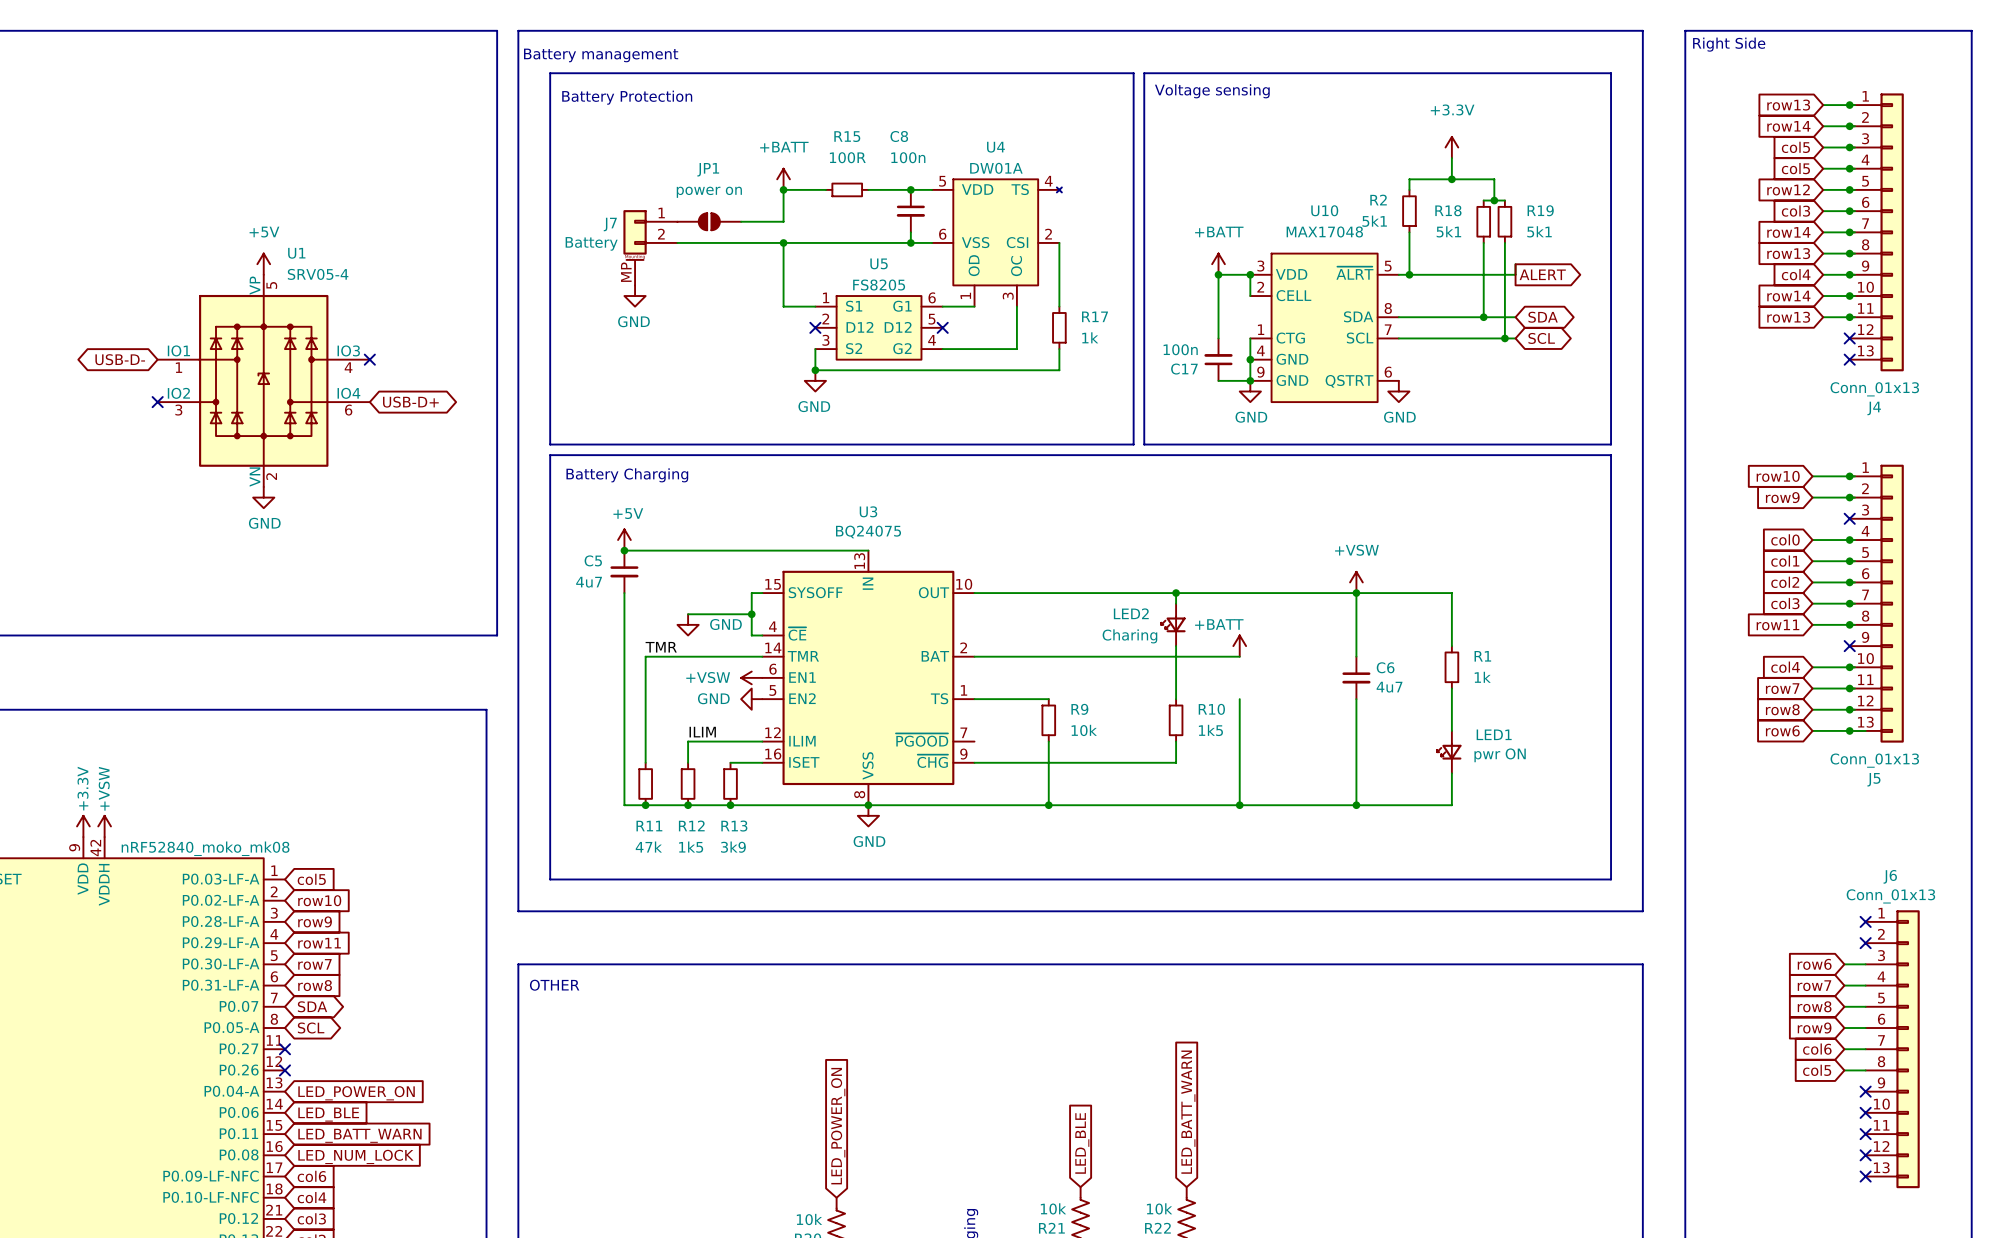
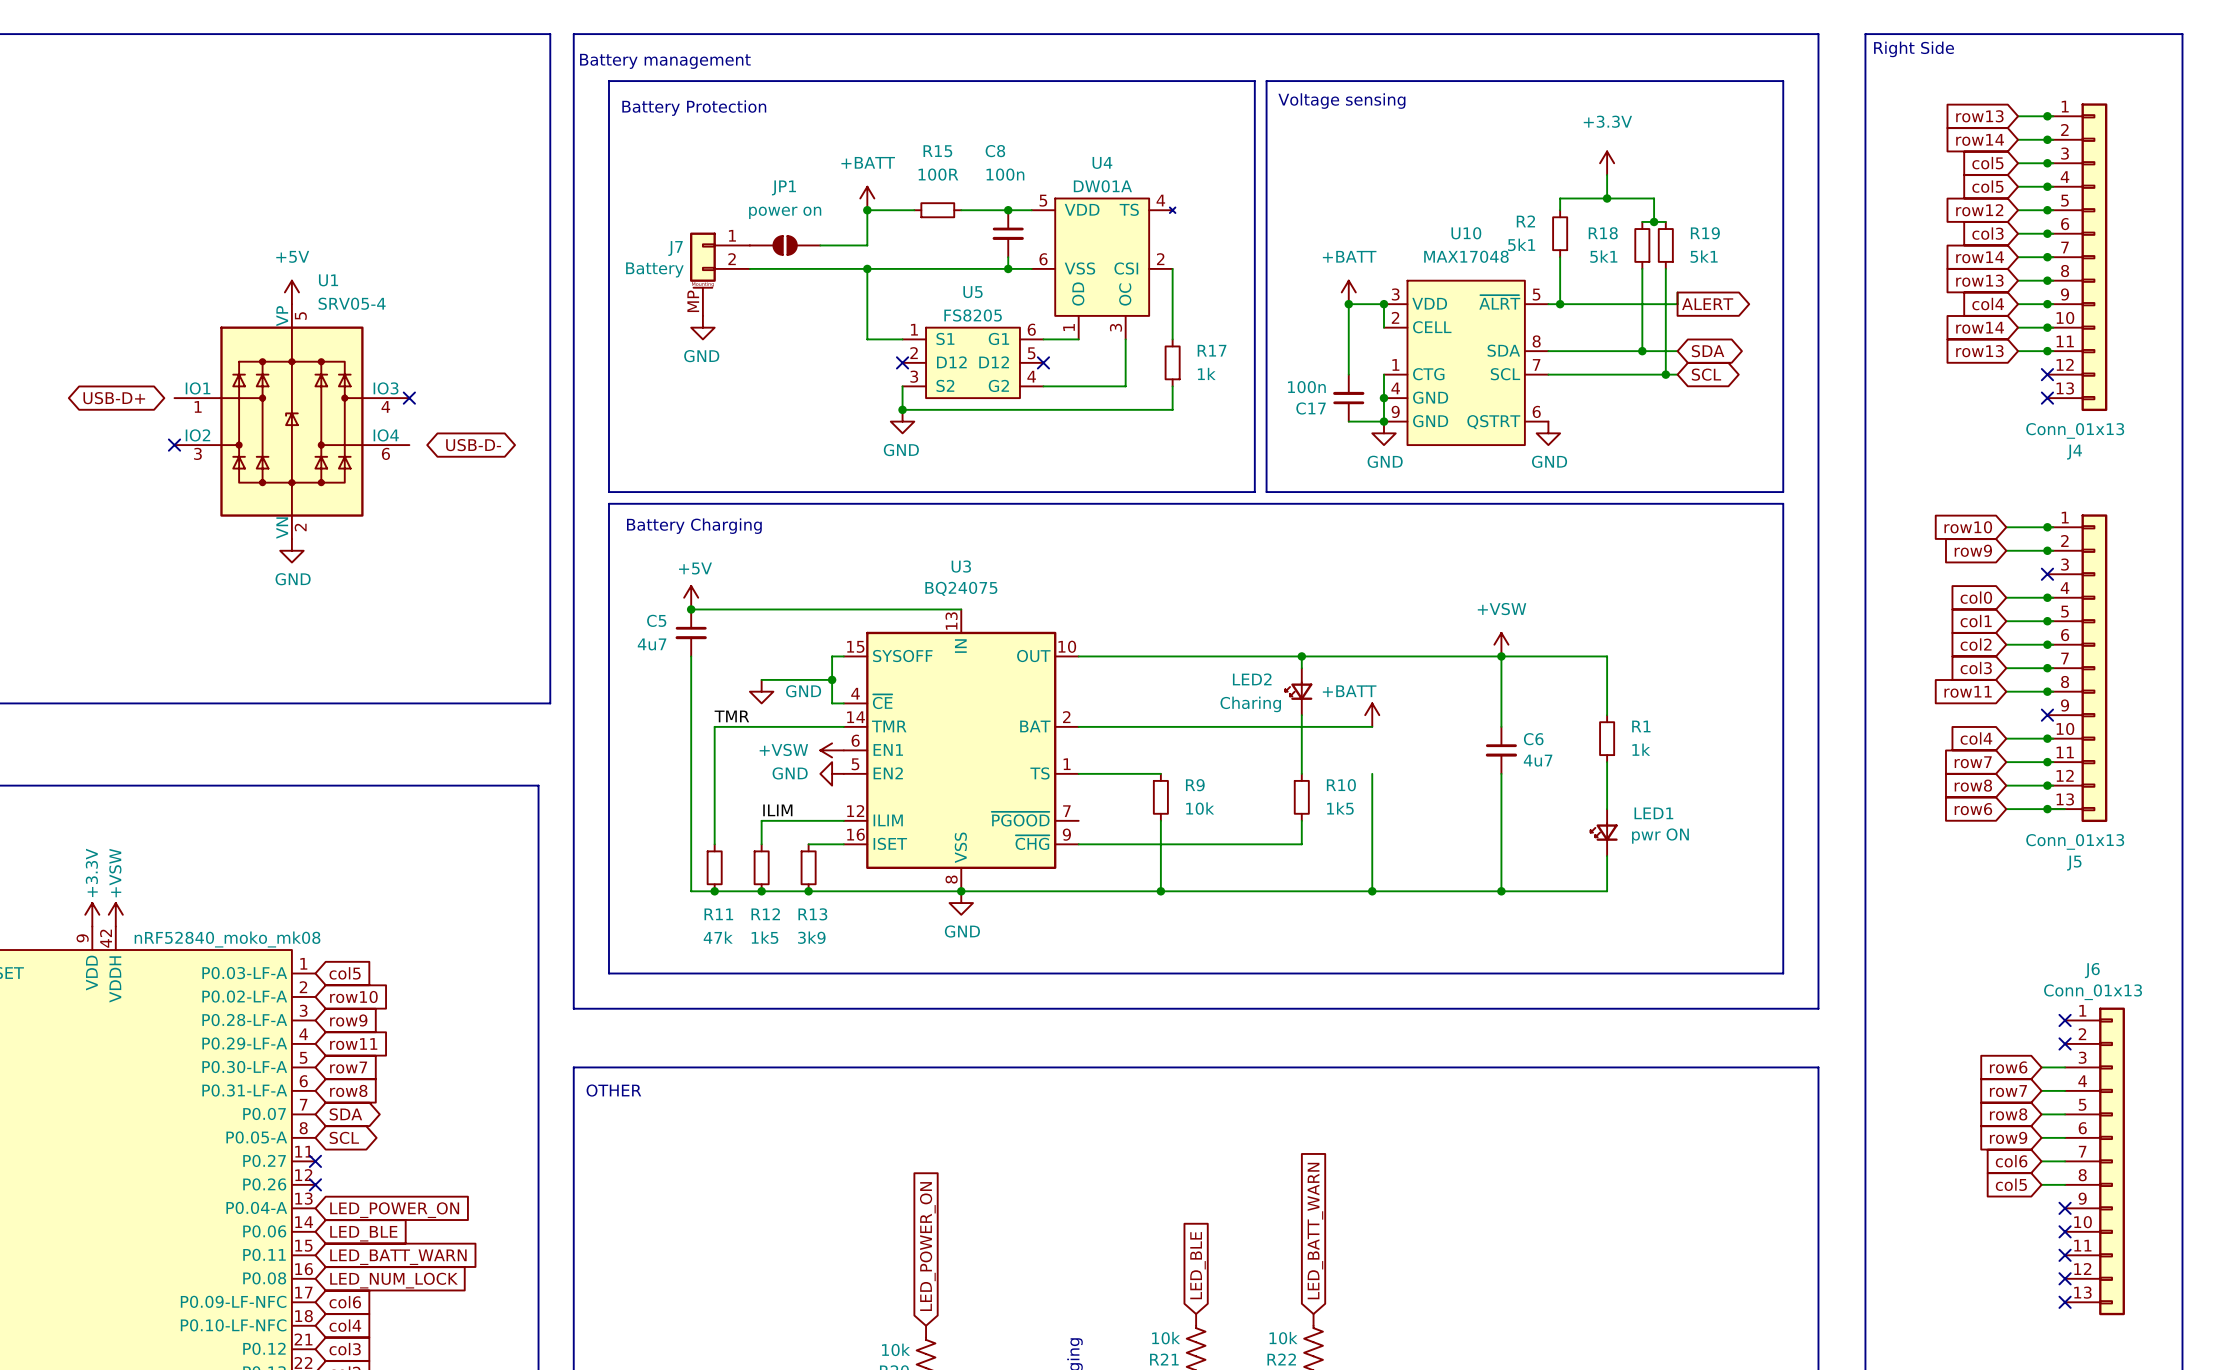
global label: USB-D- (120, 359) -> USB-D+ (114, 398)
global label: USB-D+ (410, 402) -> USB-D- (473, 445)

